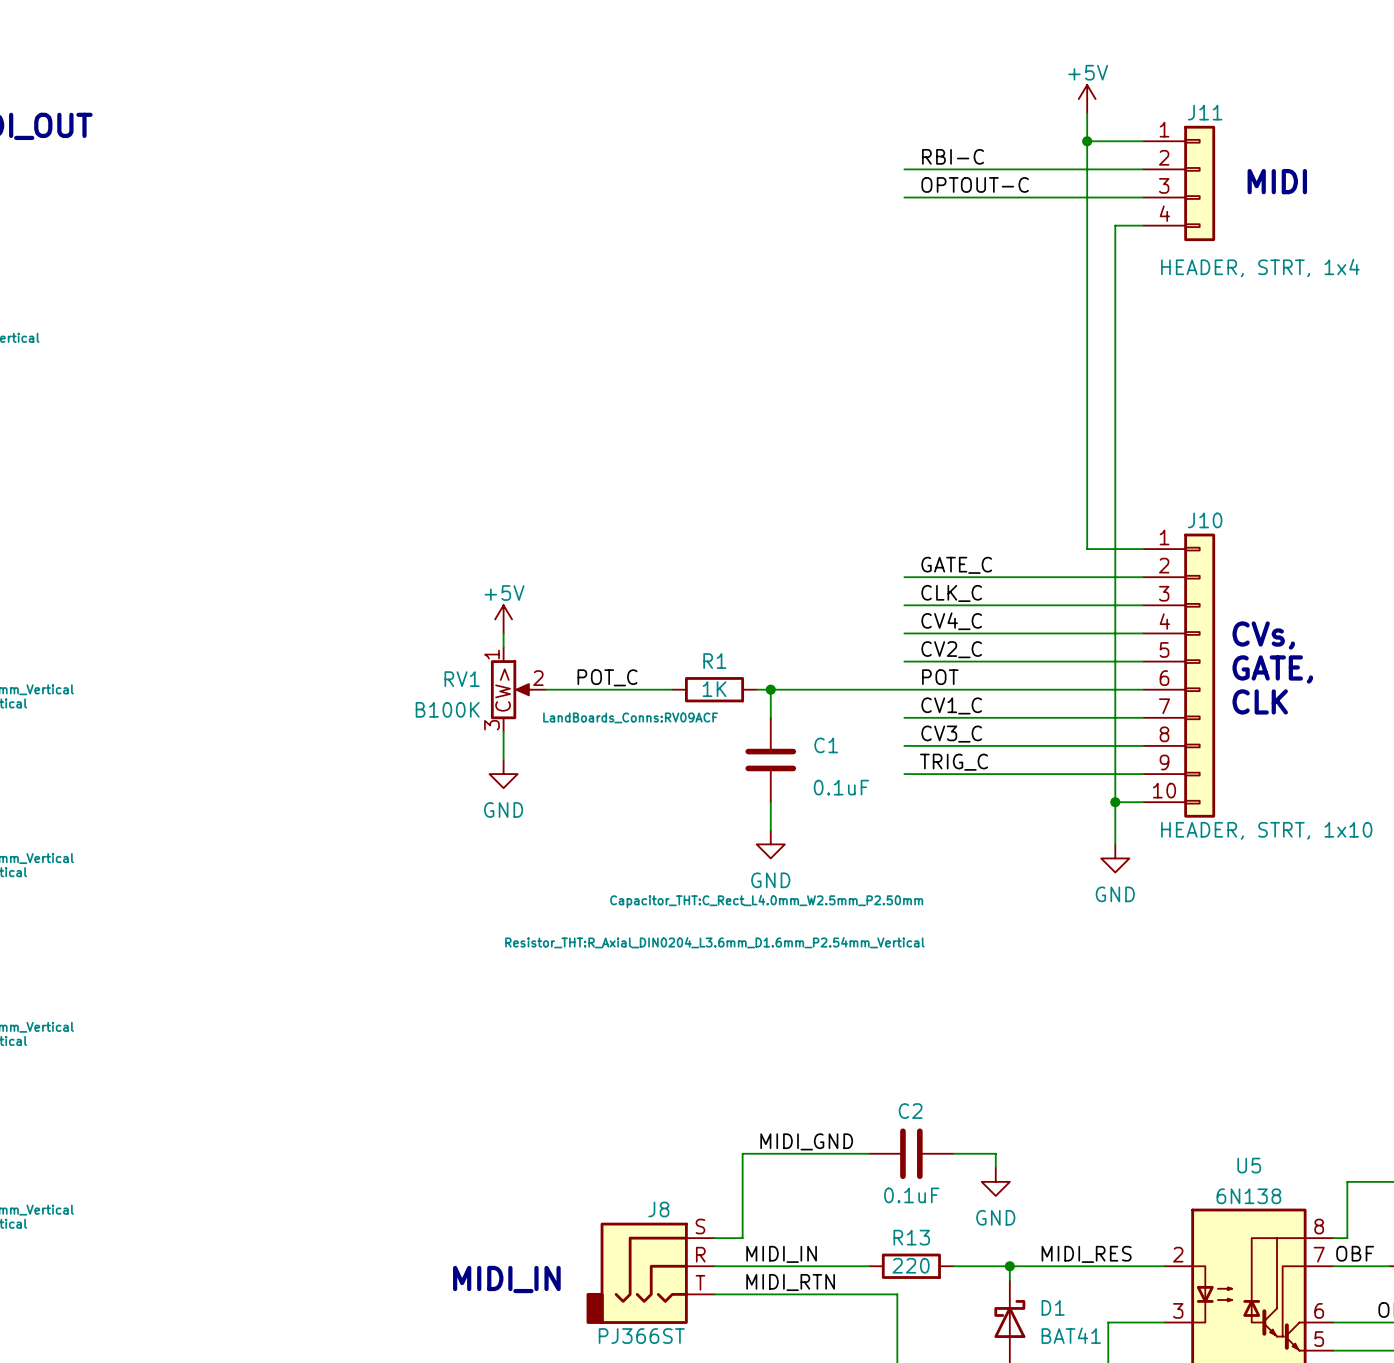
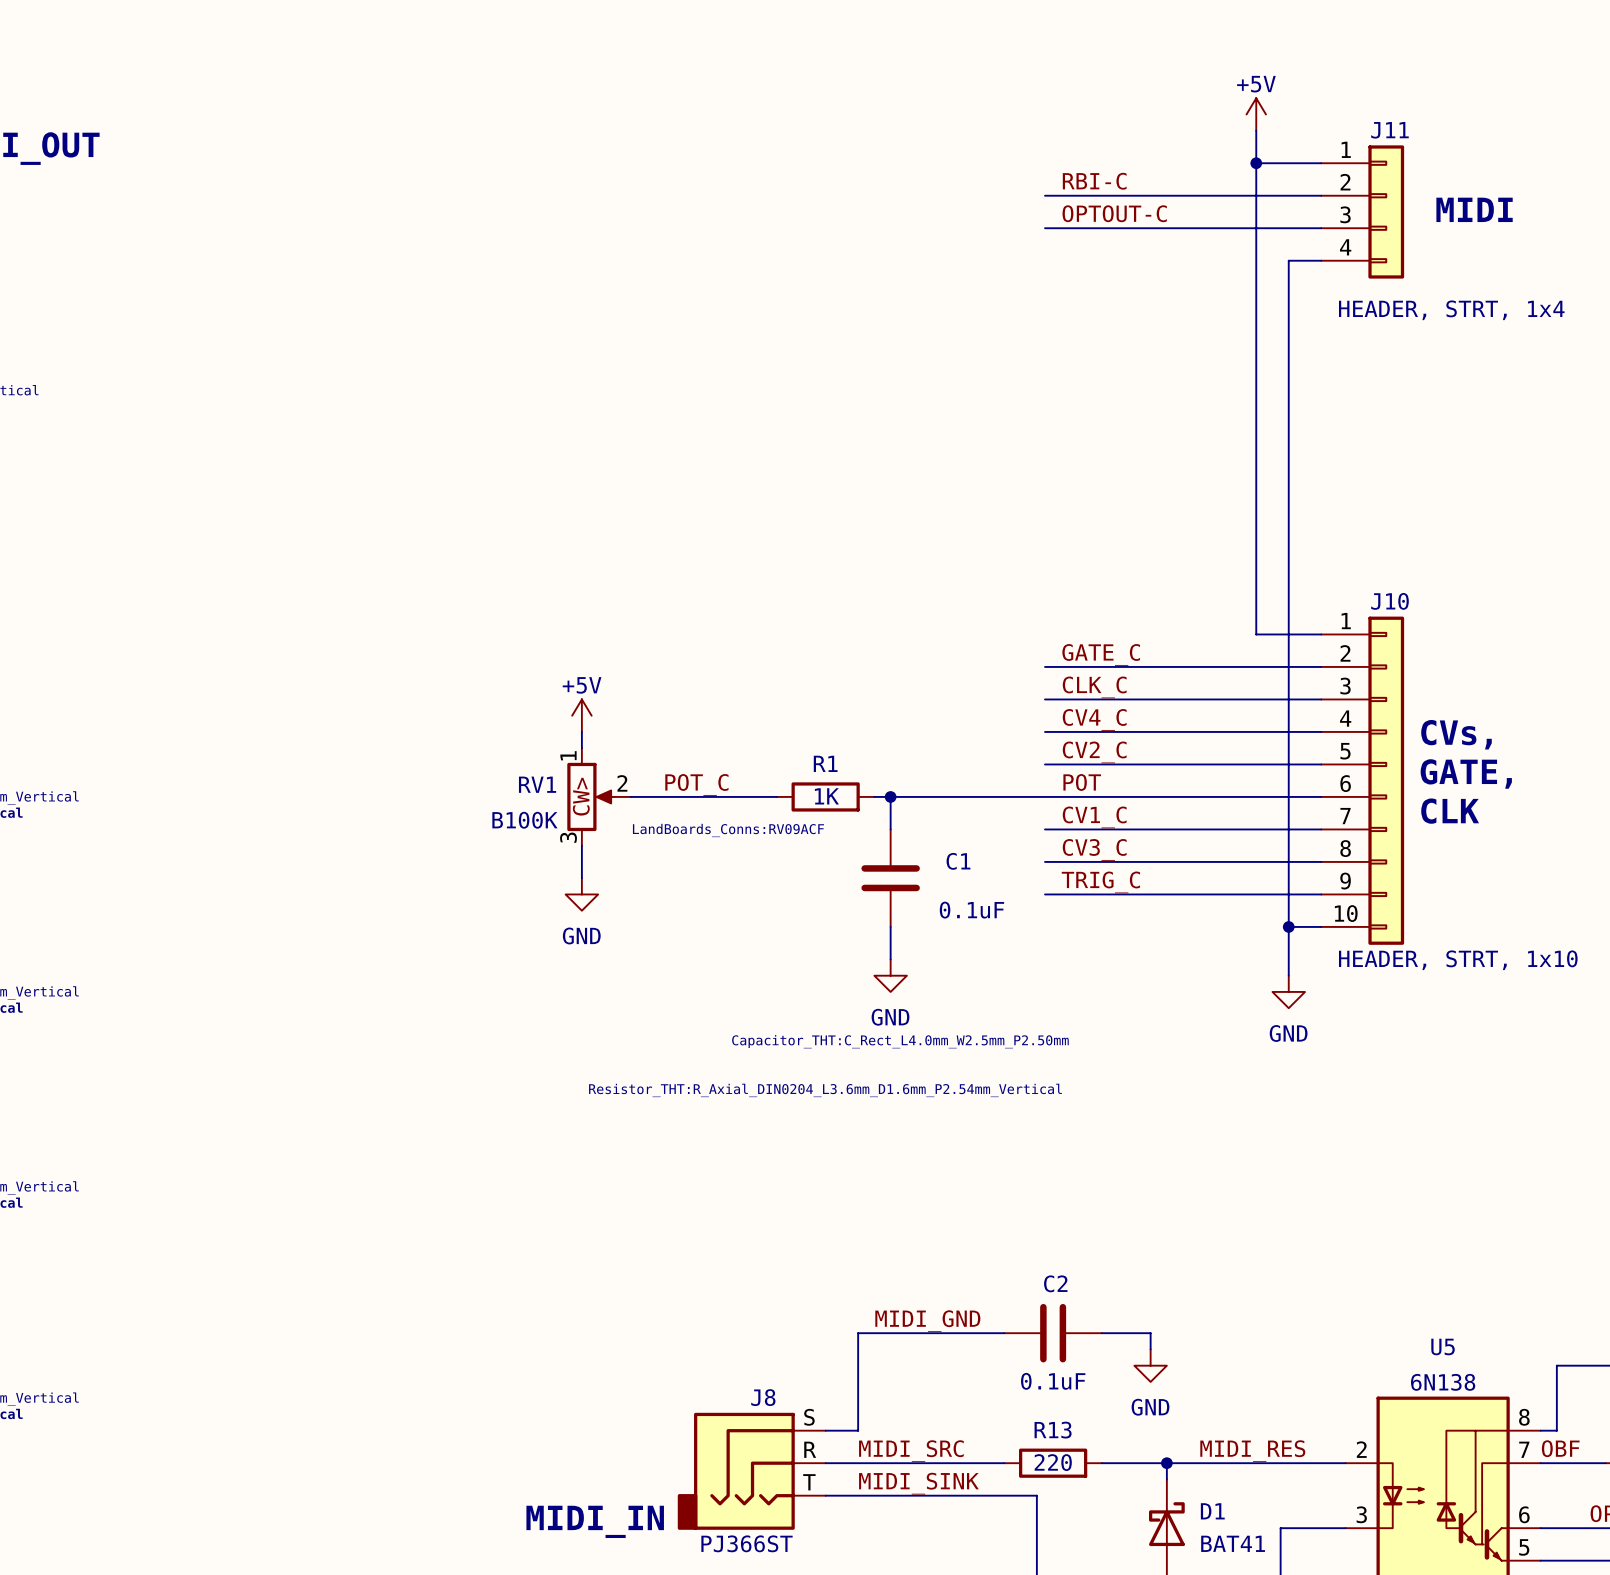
label: MIDI_IN (781, 1254) -> MIDI_SRC (911, 1451)
text position: MIDI_IN (506, 1279) -> MIDI_IN (595, 1521)
label: MIDI_RTN (790, 1282) -> MIDI_SINK (918, 1483)

